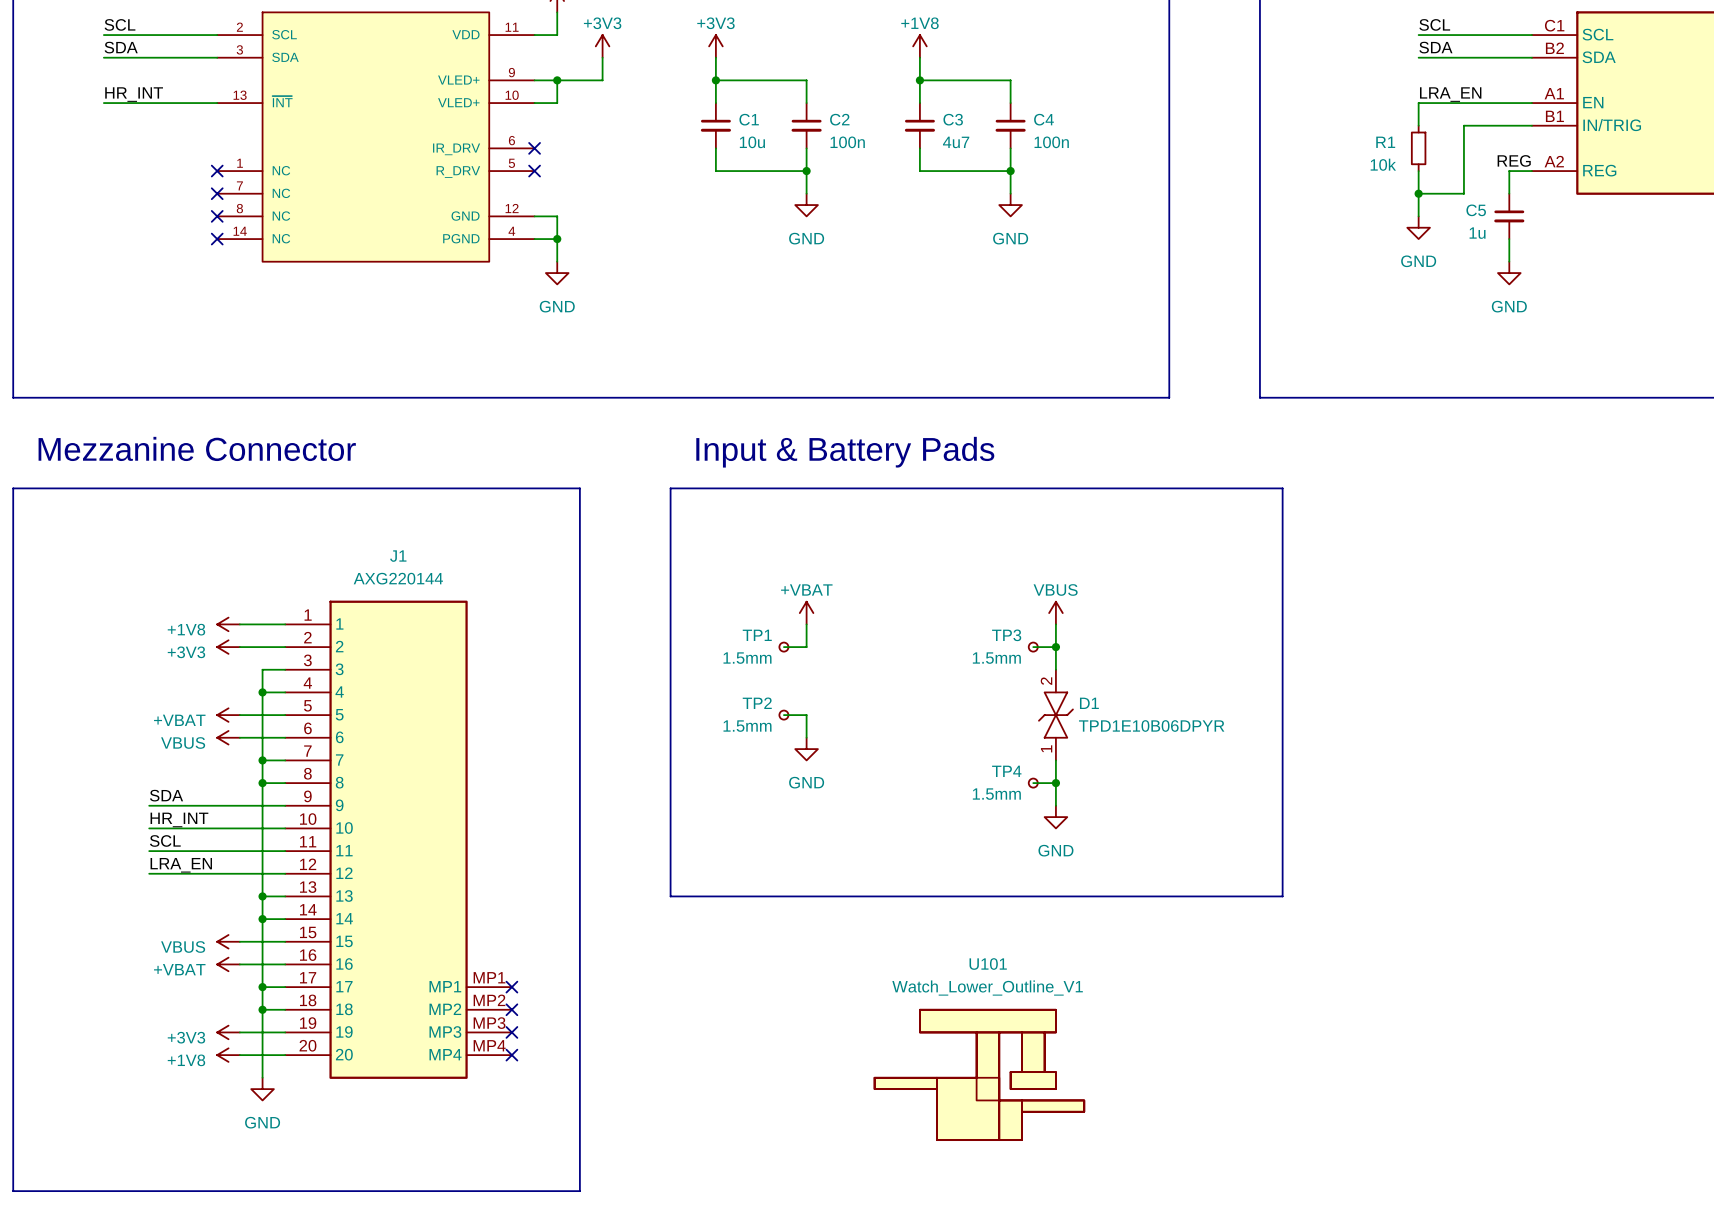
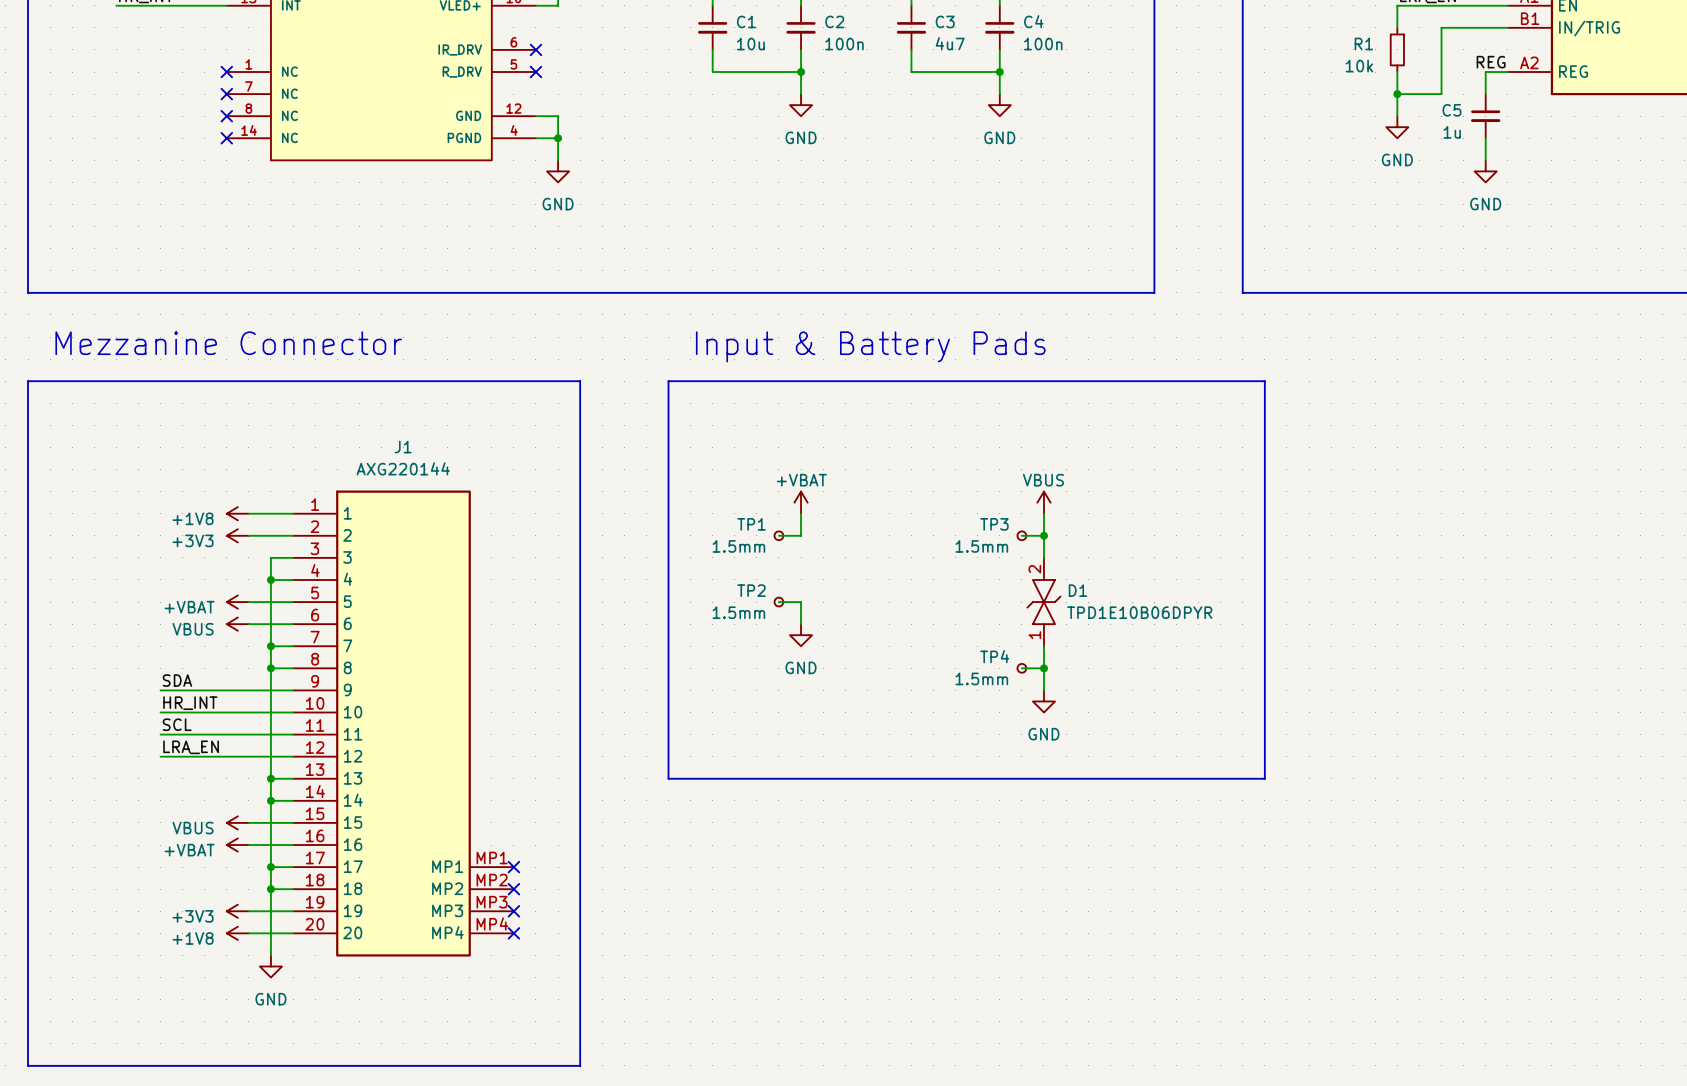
U101: Watch_Lower_Outline_V1 (979, 1074) -> none

